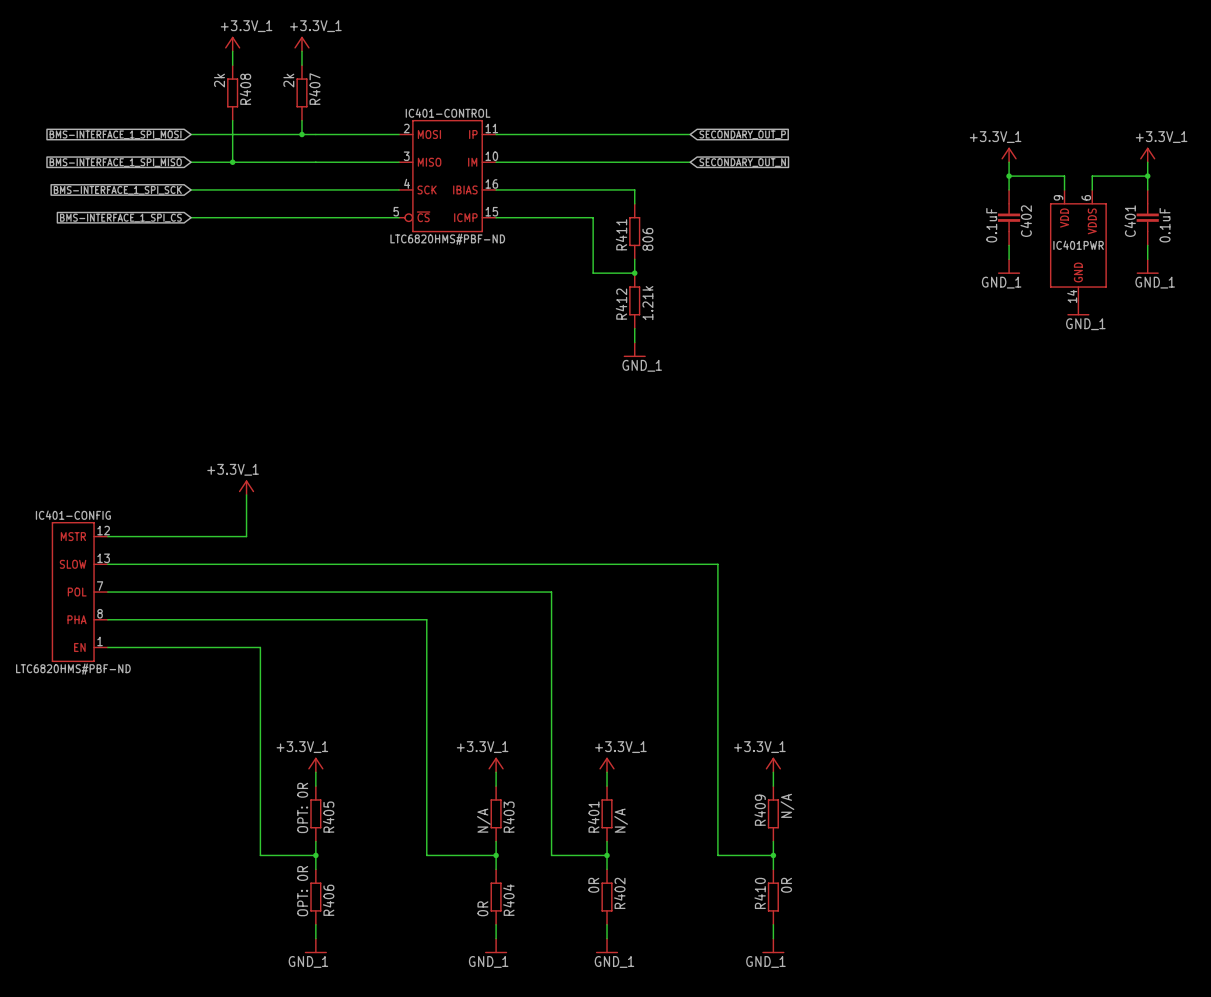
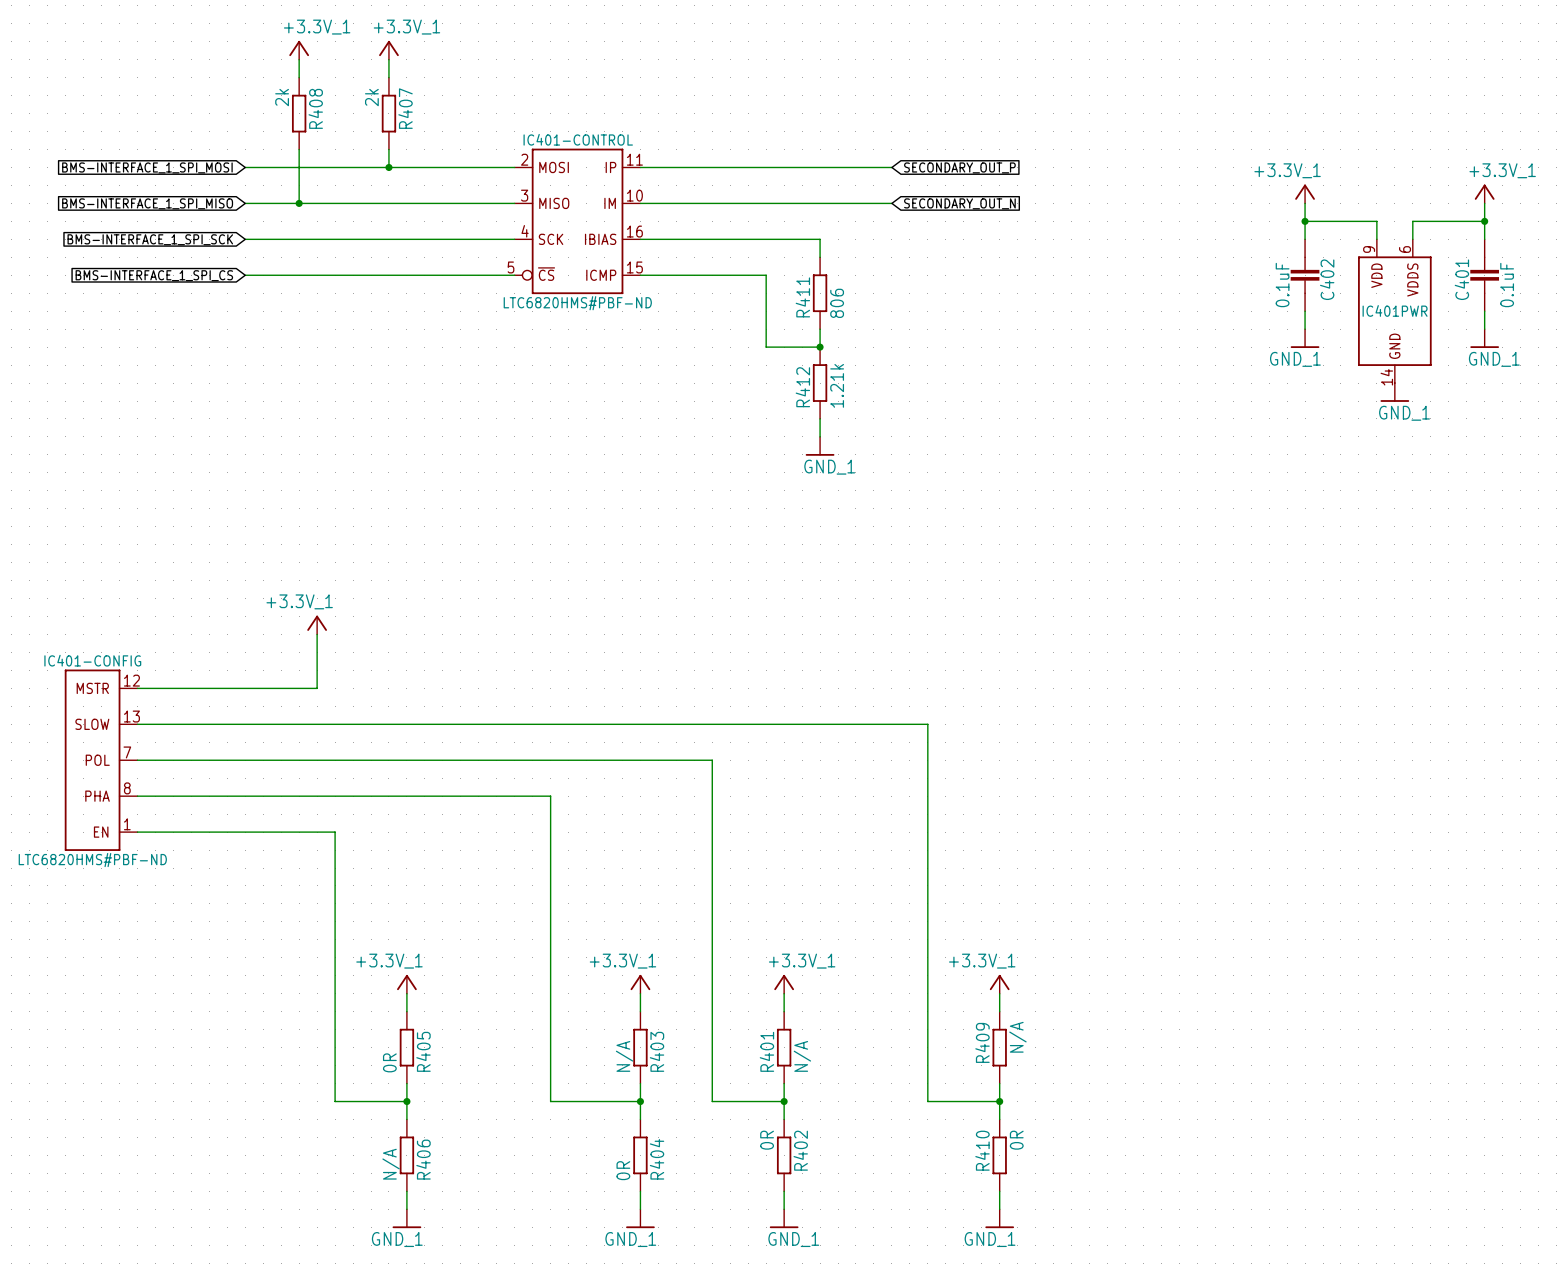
R405 value: OPT: 0R (302, 807) -> 0R (389, 1062)
R406 value: OPT: 0R (302, 891) -> N/A (391, 1164)

